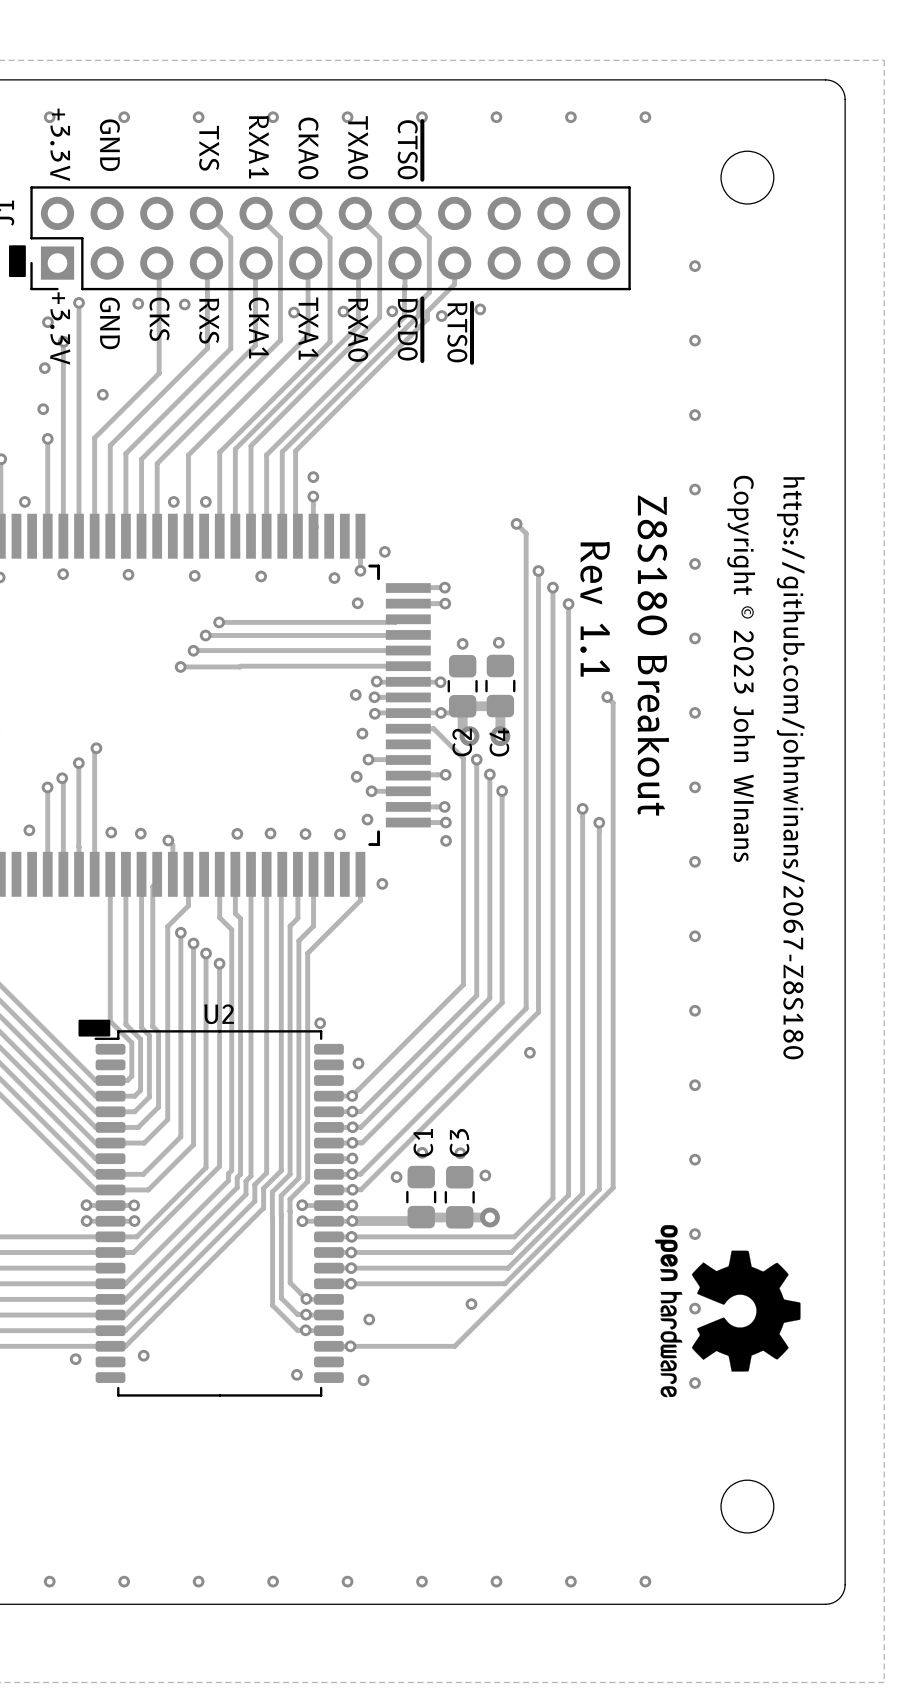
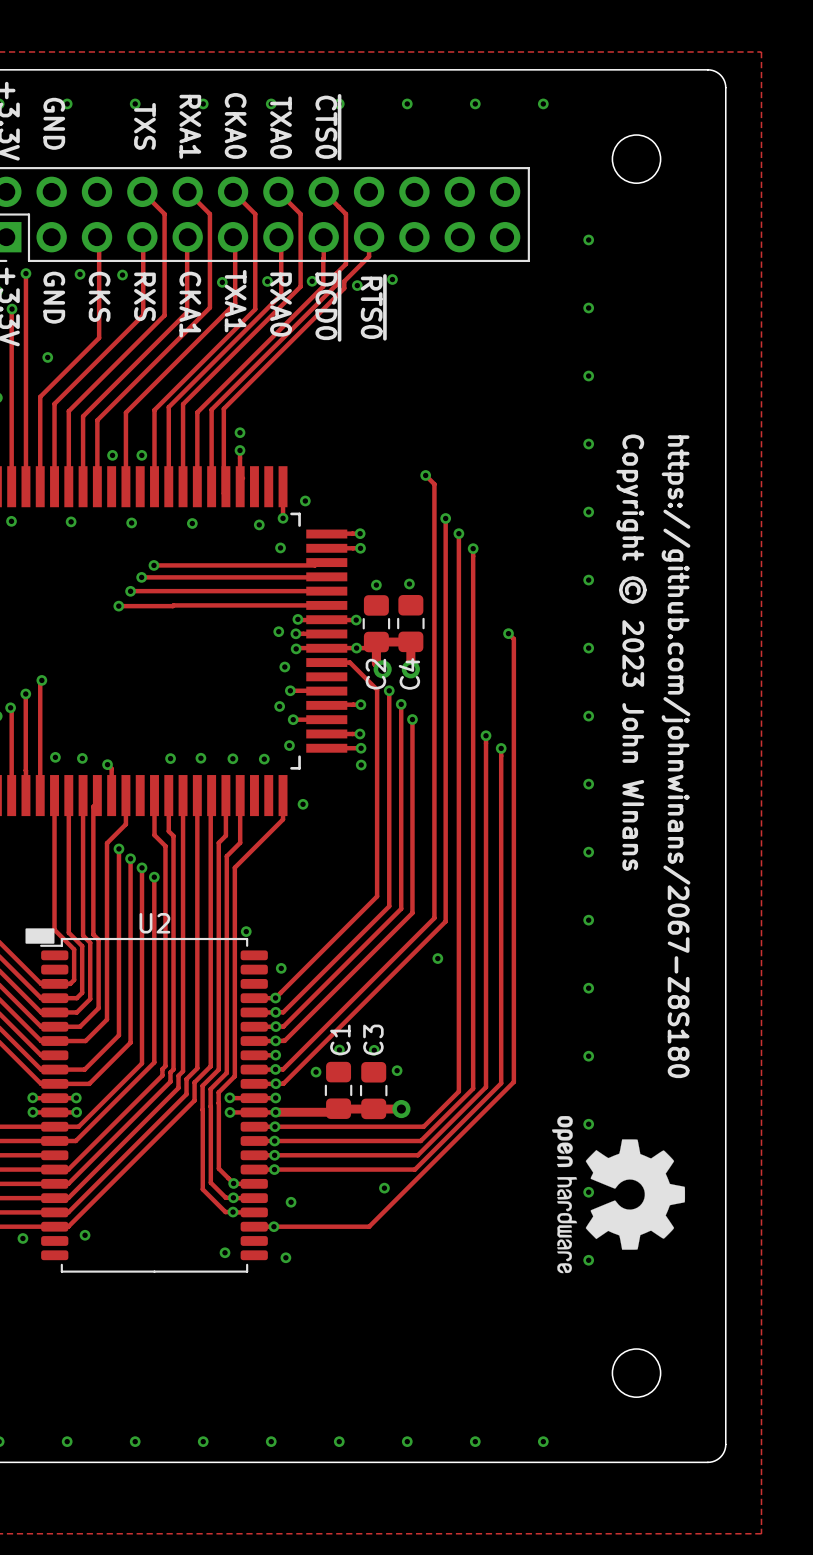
text: Rev 1.1 (595, 609) -> none
text: Z8S180 Breakout (653, 655) -> none

